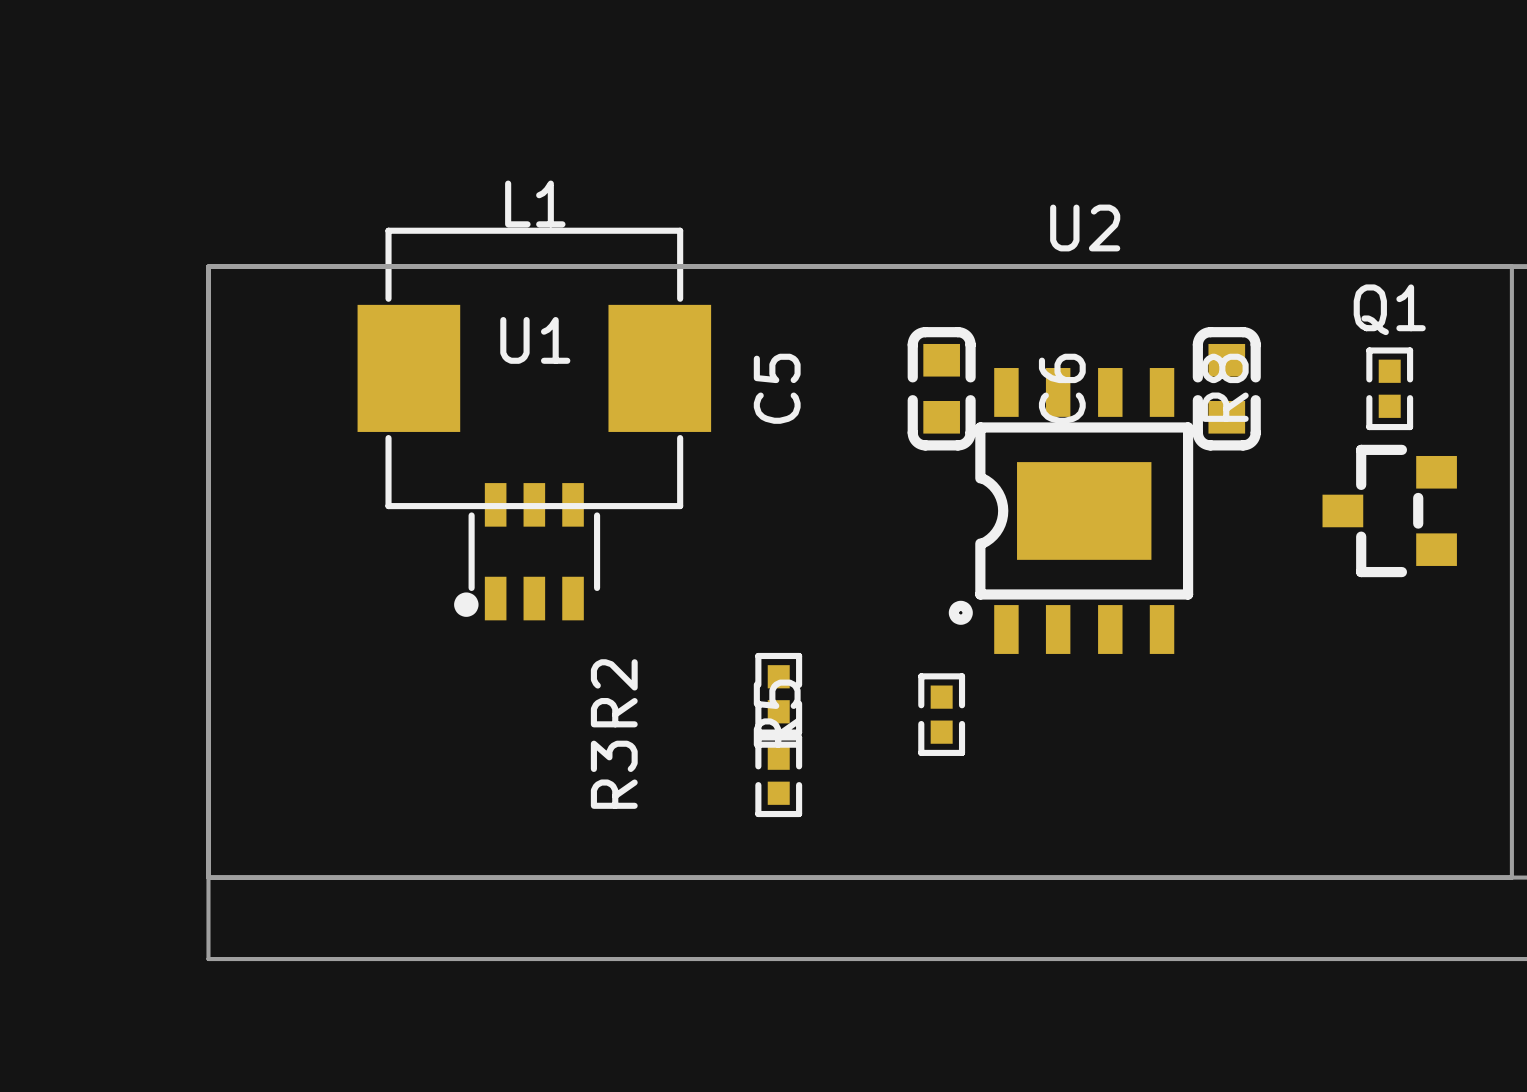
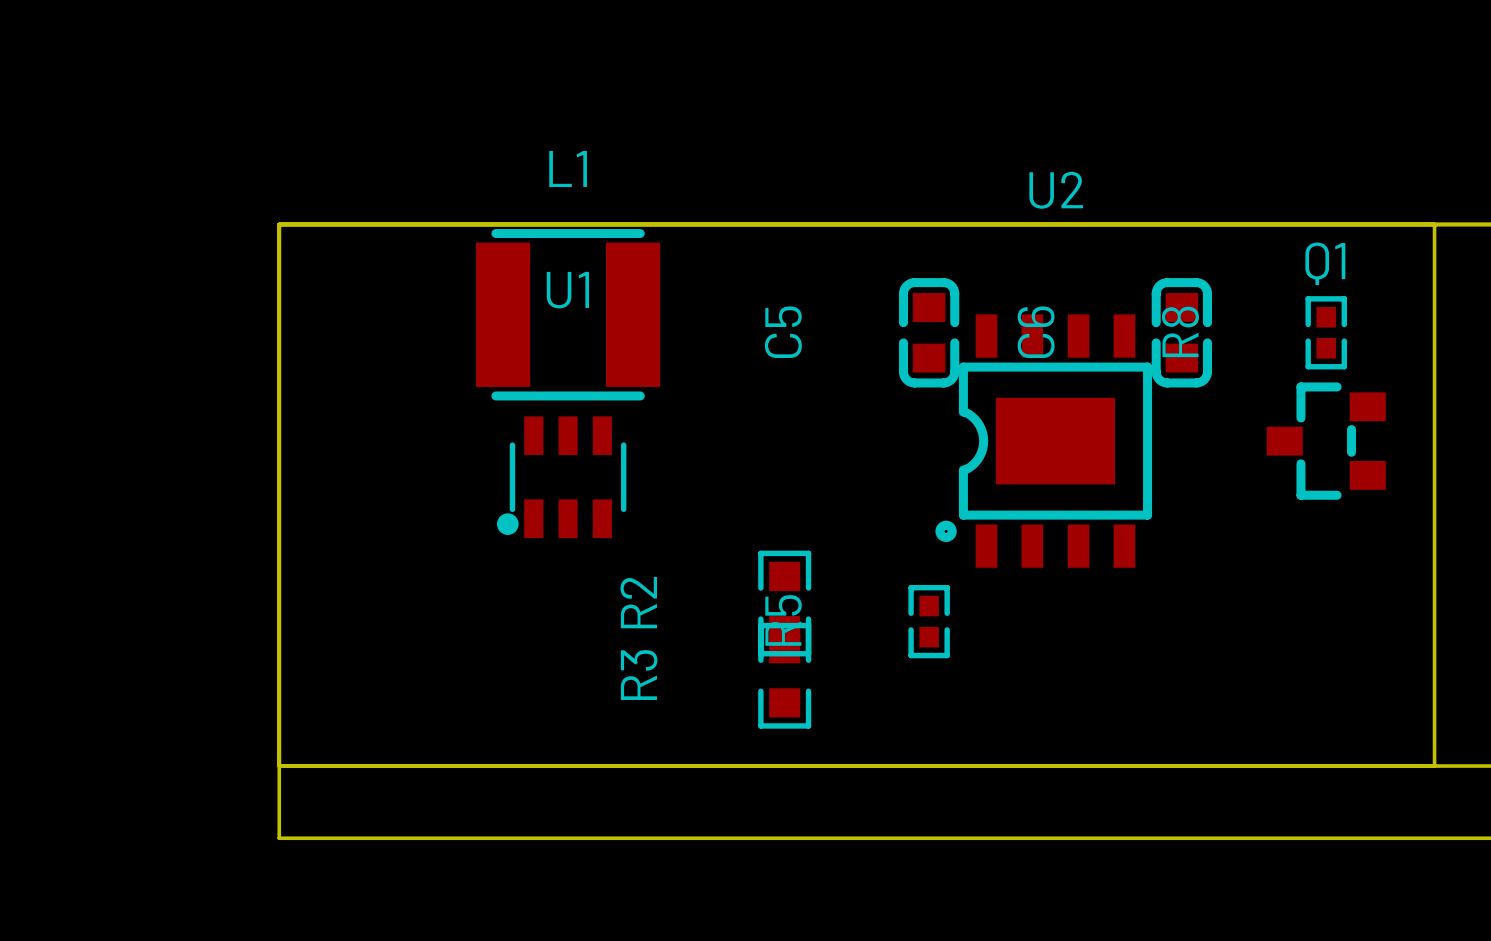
L1 footprint: [357, 227, 712, 510] -> [476, 228, 661, 401]
R2 footprint: [755, 652, 803, 736] -> [758, 550, 812, 657]
R3 footprint: [755, 734, 803, 818] -> [758, 622, 812, 729]

